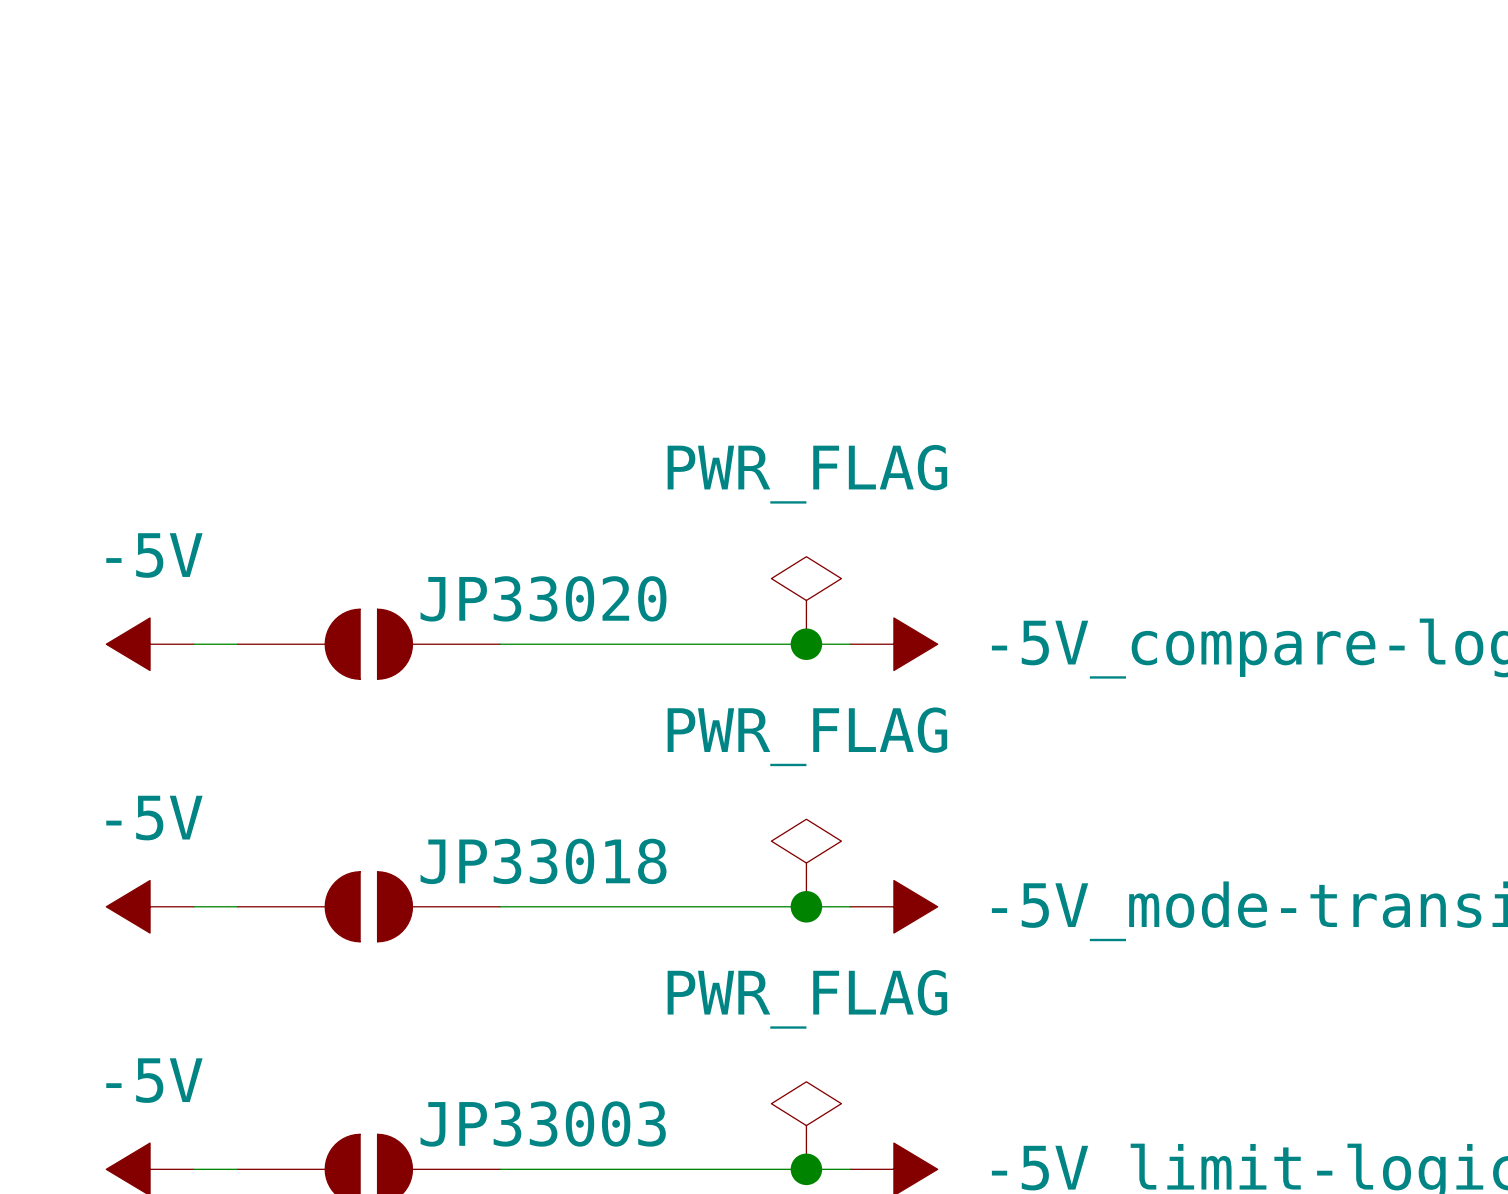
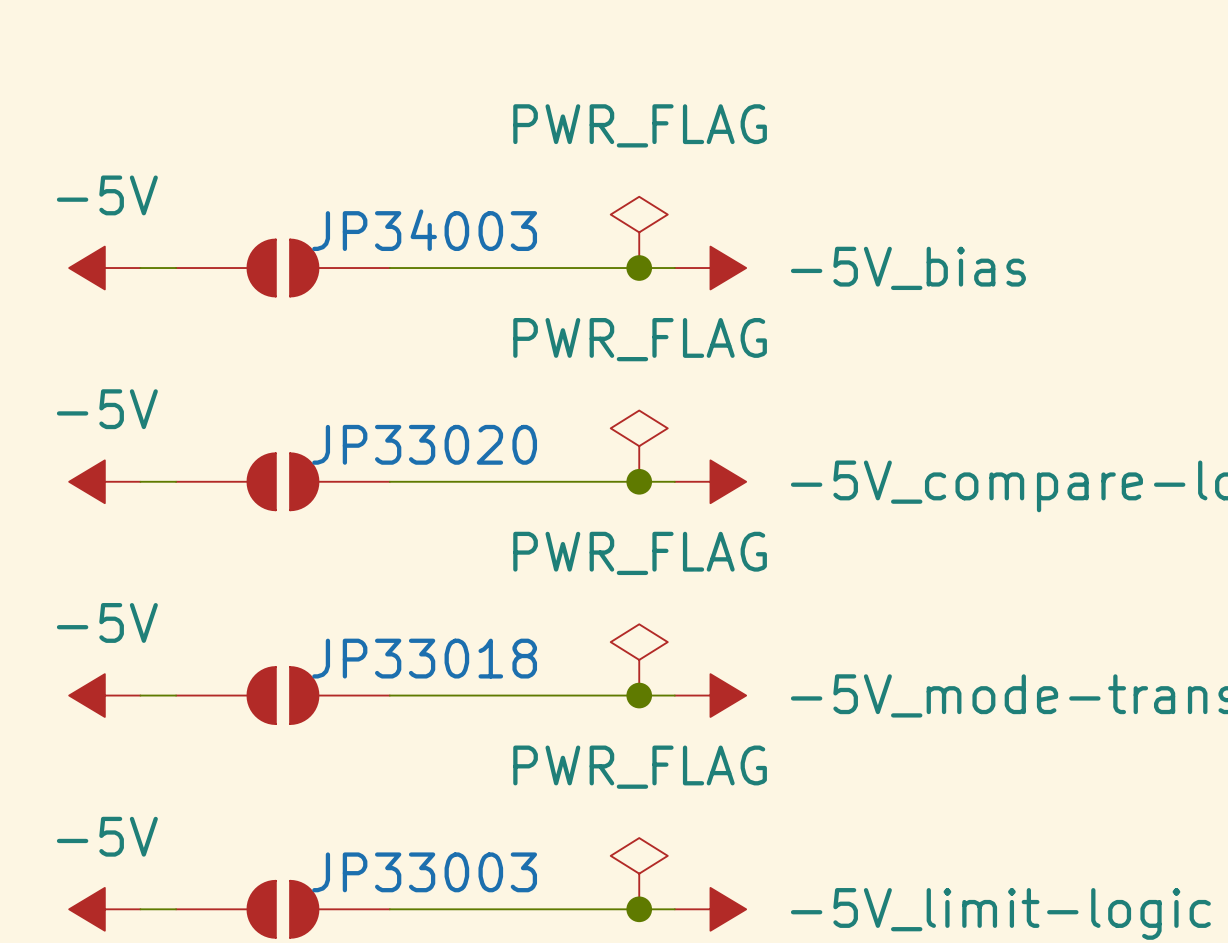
power symbol: none -> PWR_FLAG (639, 232)
power symbol: none -> -5V (104, 268)
wire: none -> (140, 268) (176, 268)
JP34003: none -> (282, 268)
wire: none -> (389, 268) (674, 268)
junction: none -> (639, 268)
power symbol: none -> -5V_bias (710, 268)

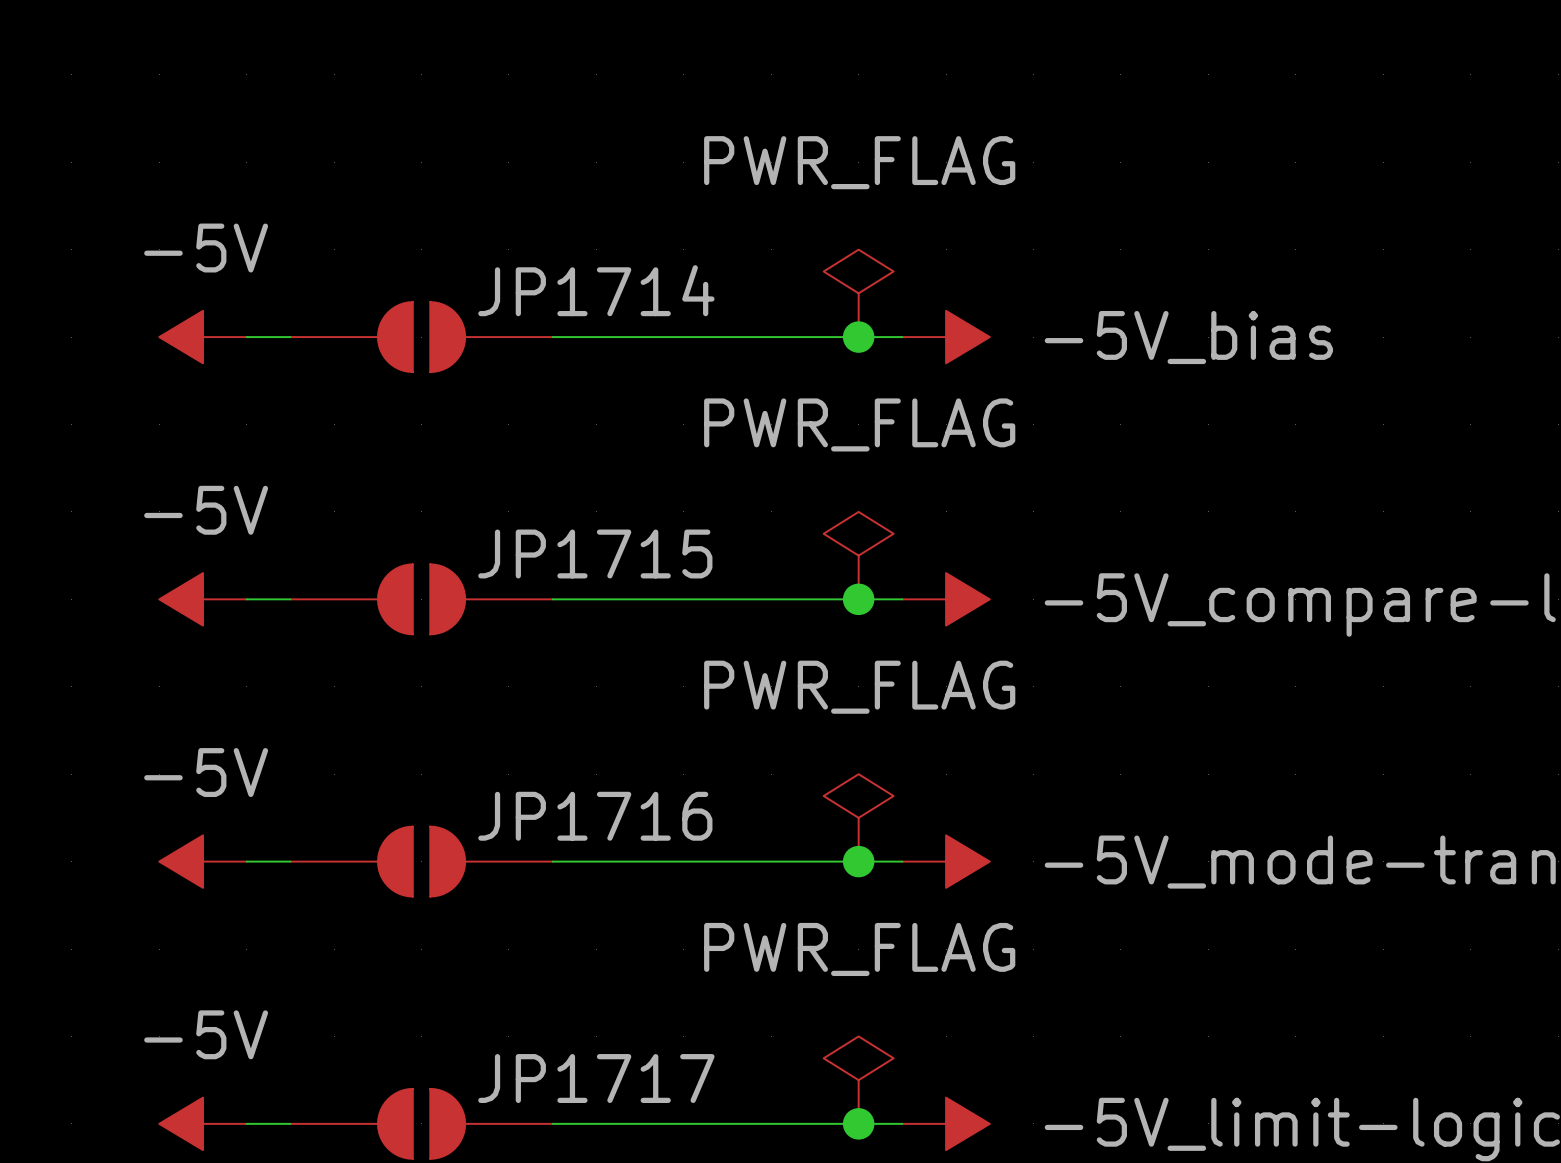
JP34003 name: JP34003 (424, 230) -> JP1714 (596, 290)
JP33020 name: JP33020 (424, 444) -> JP1715 (595, 553)
JP33018 name: JP33018 (424, 658) -> JP1716 (595, 816)
JP33003 name: JP33003 (424, 872) -> JP1717 (596, 1078)

